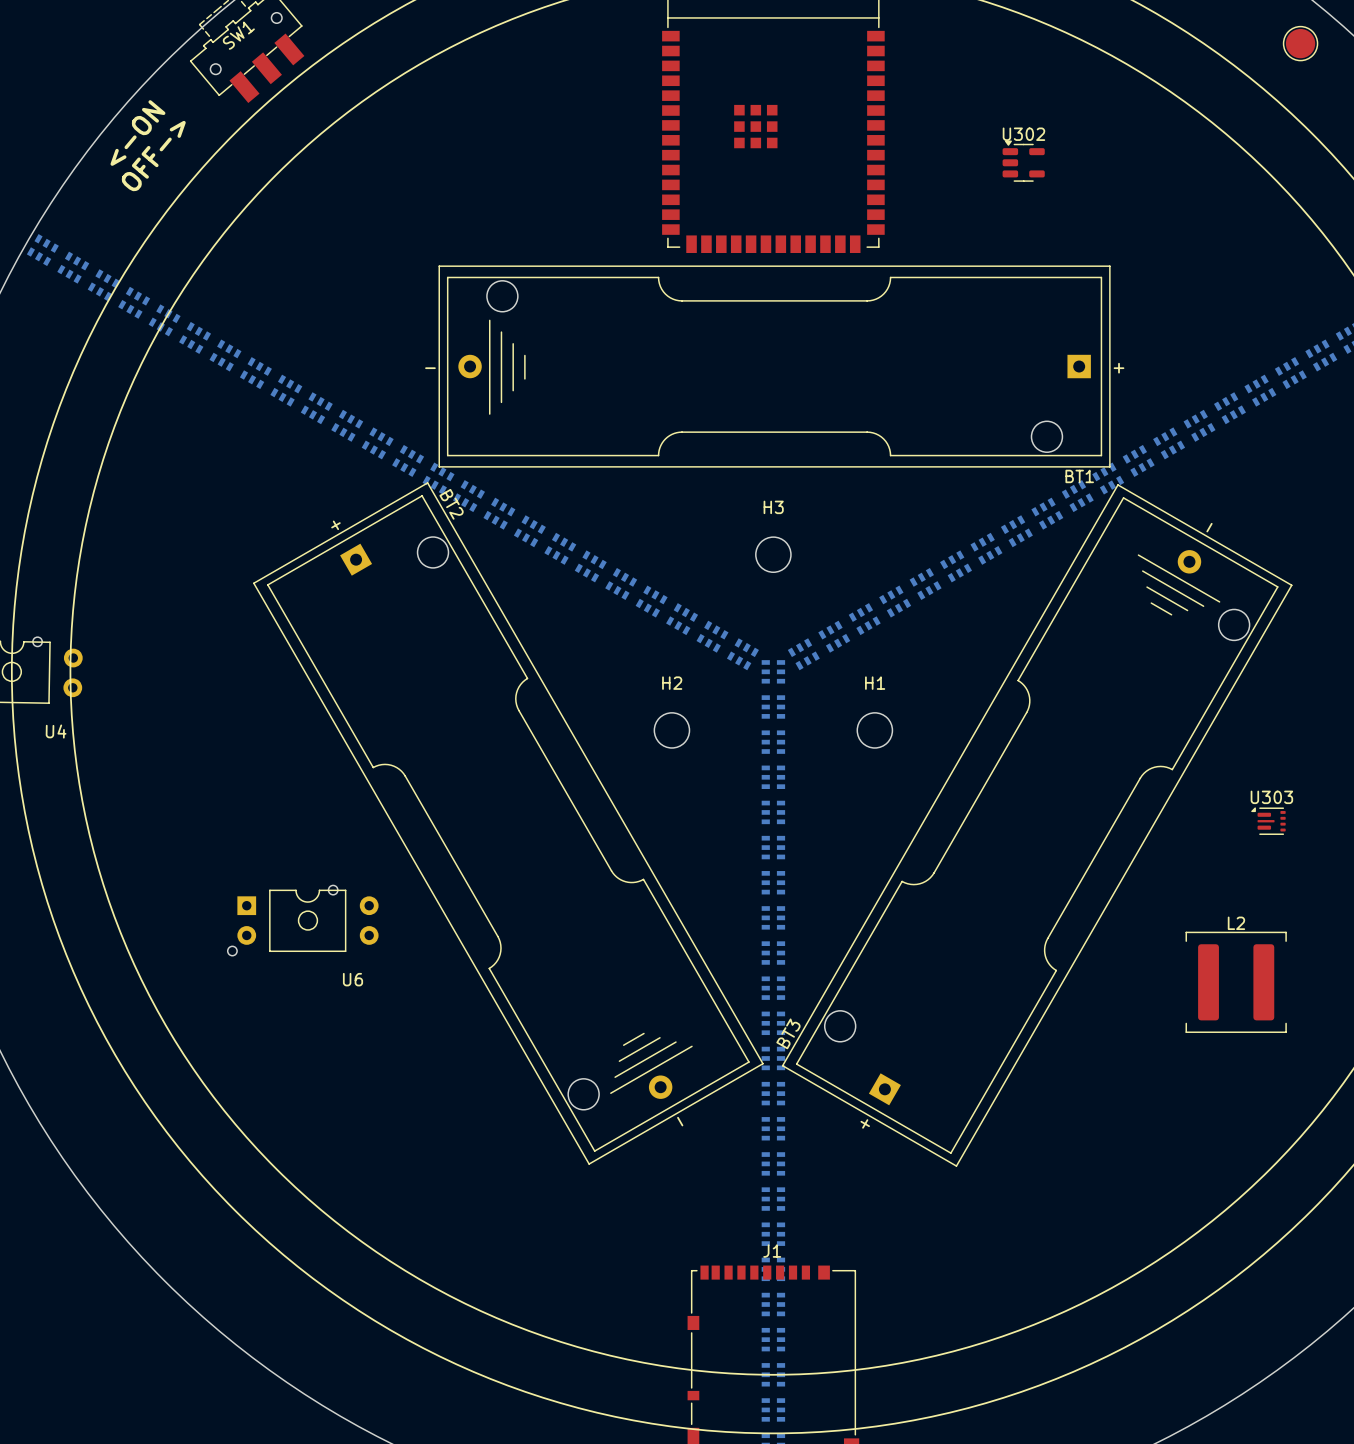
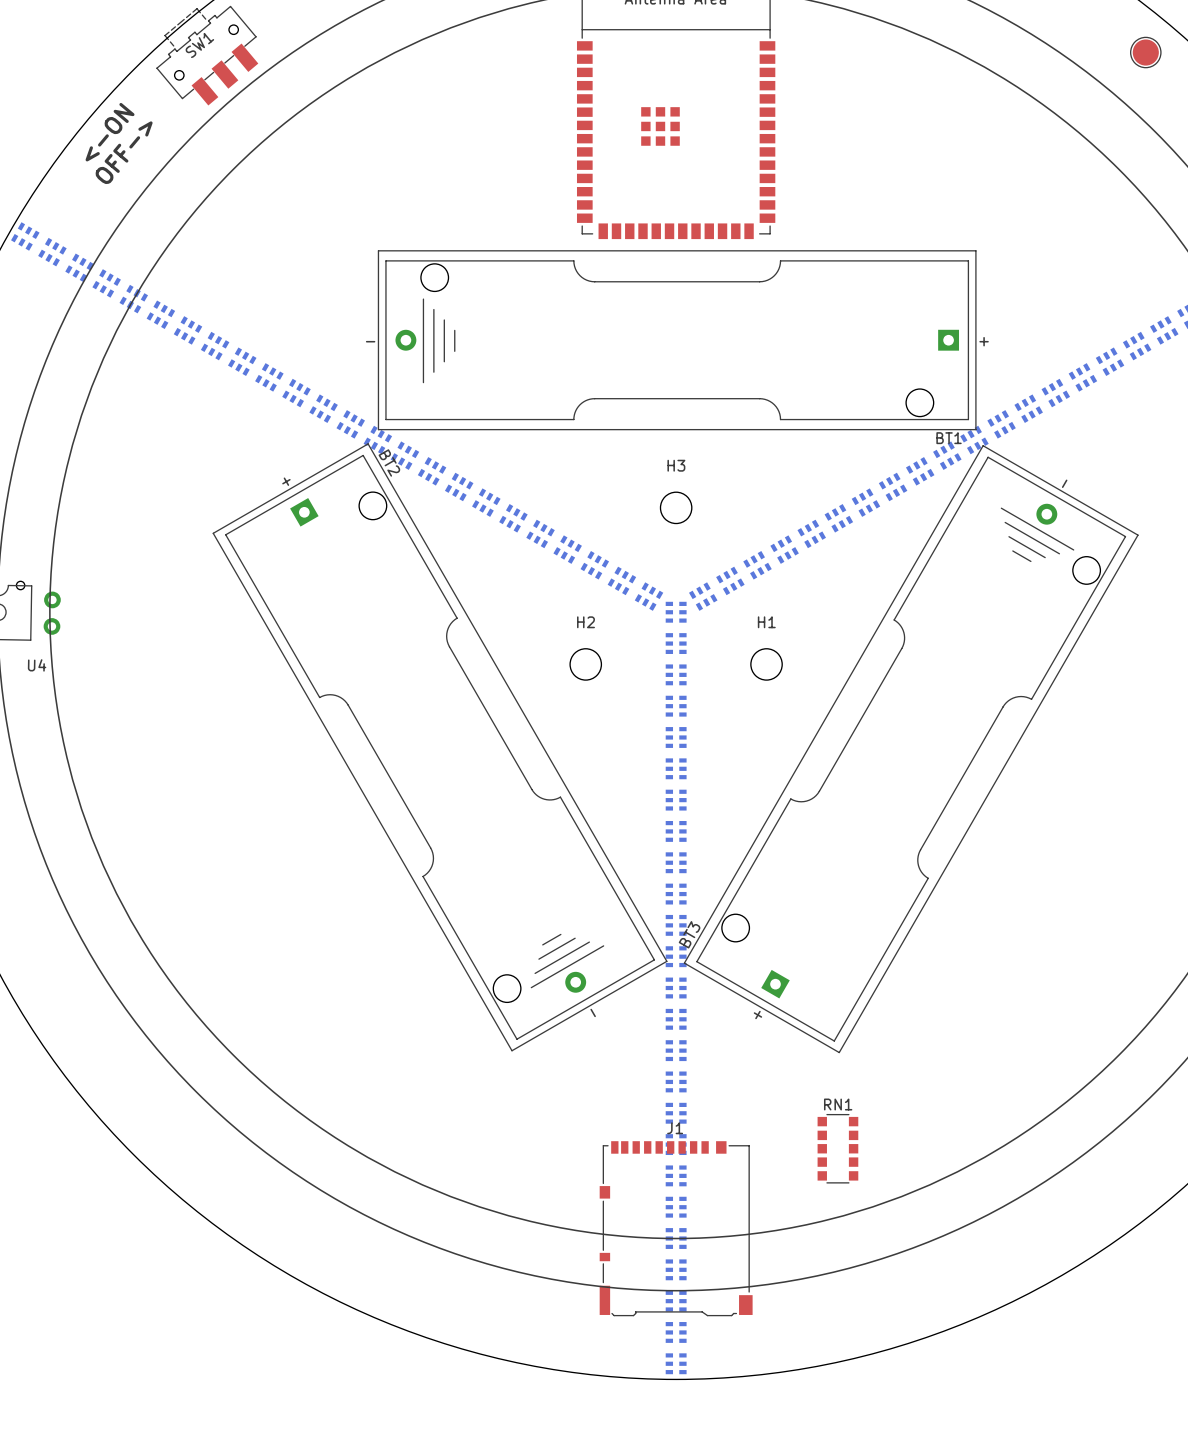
U302: (1023, 161) -> none
U303: (1268, 821) -> none
U6: (303, 920) -> none
L2: (1236, 982) -> none
RN1: none -> (837, 1148)

